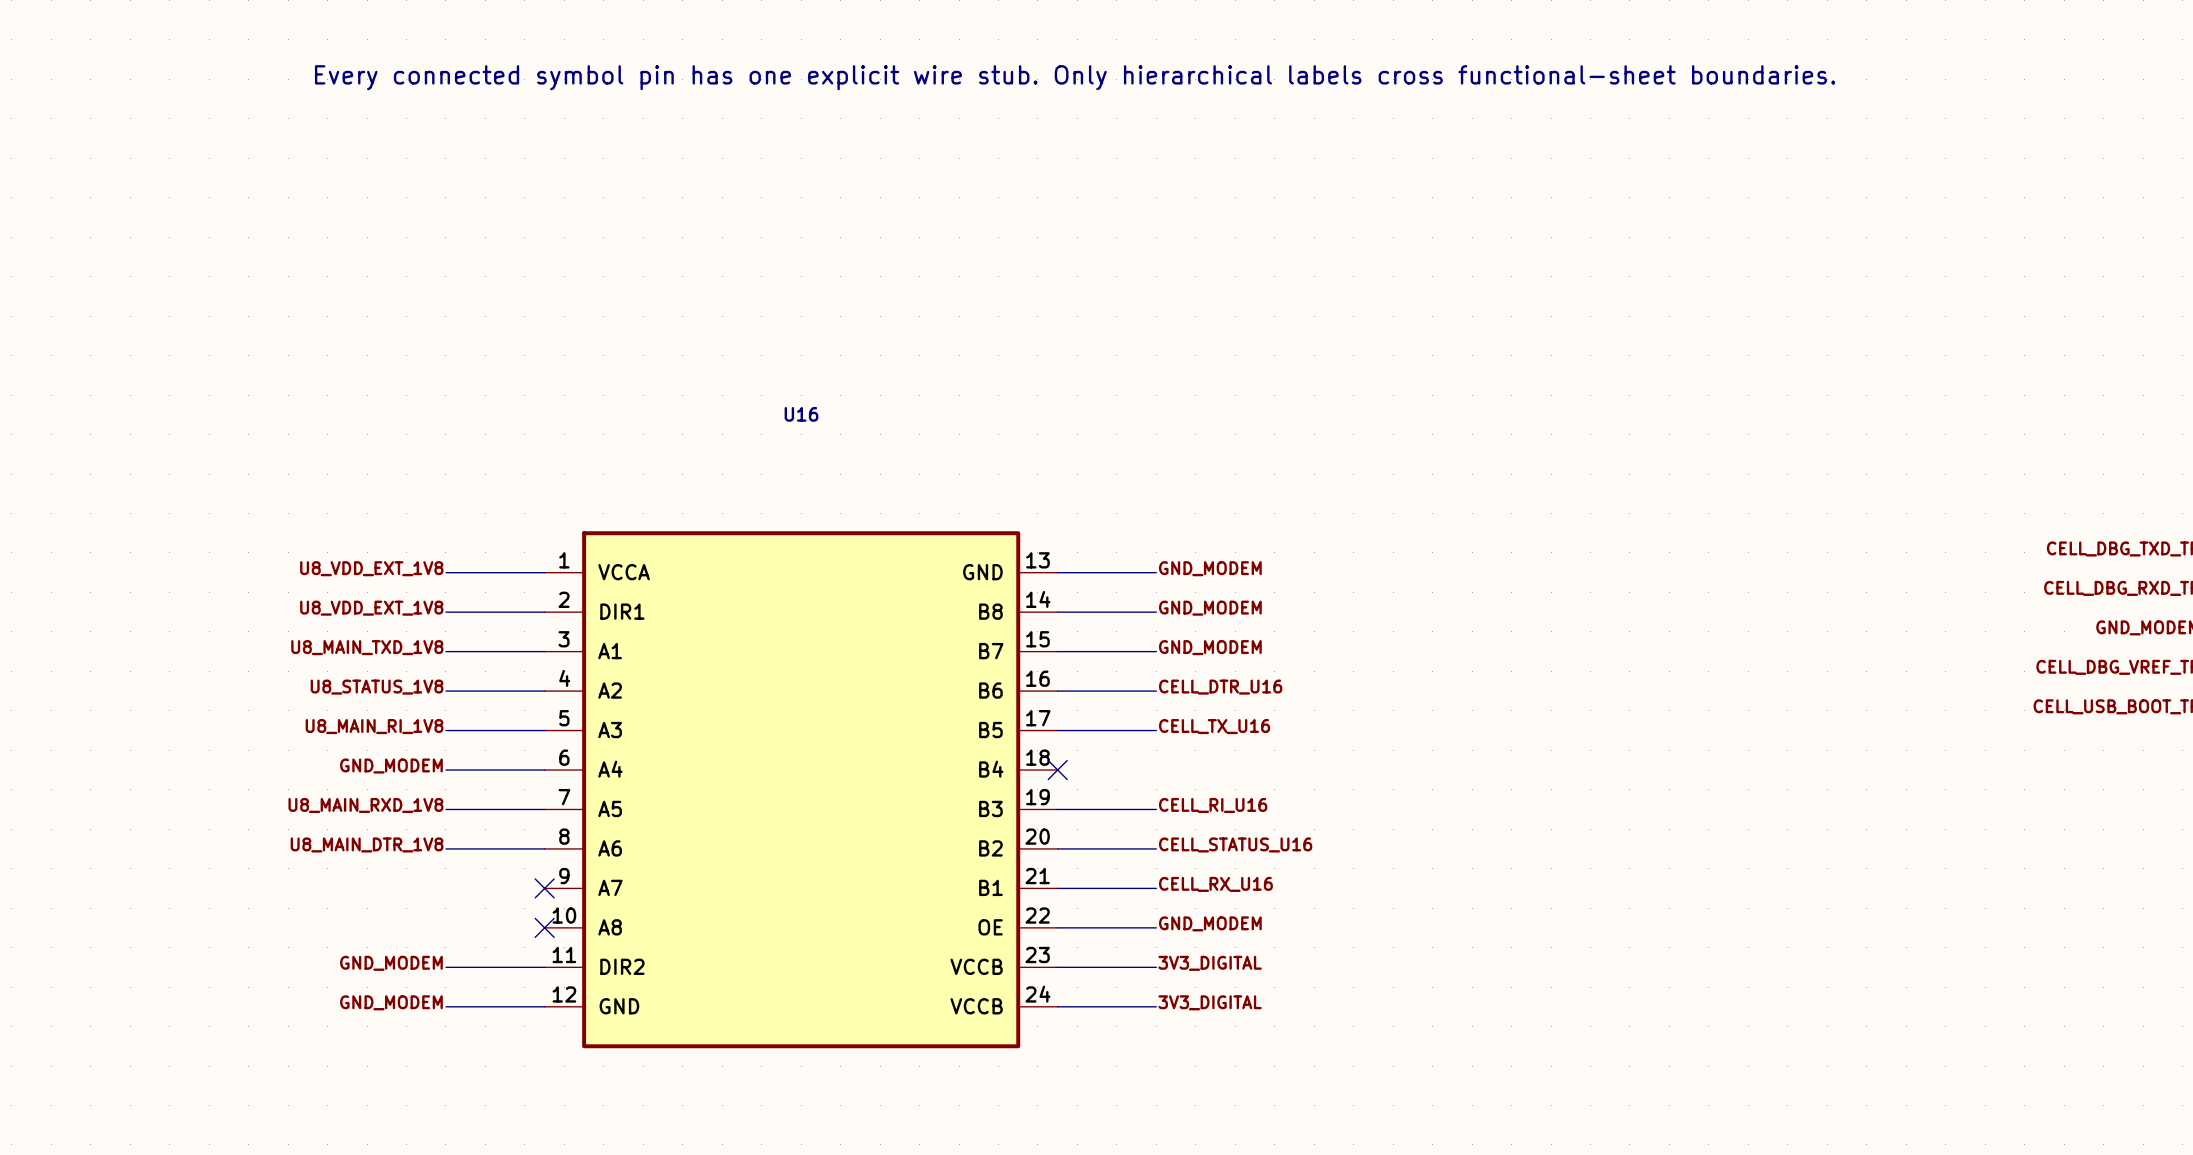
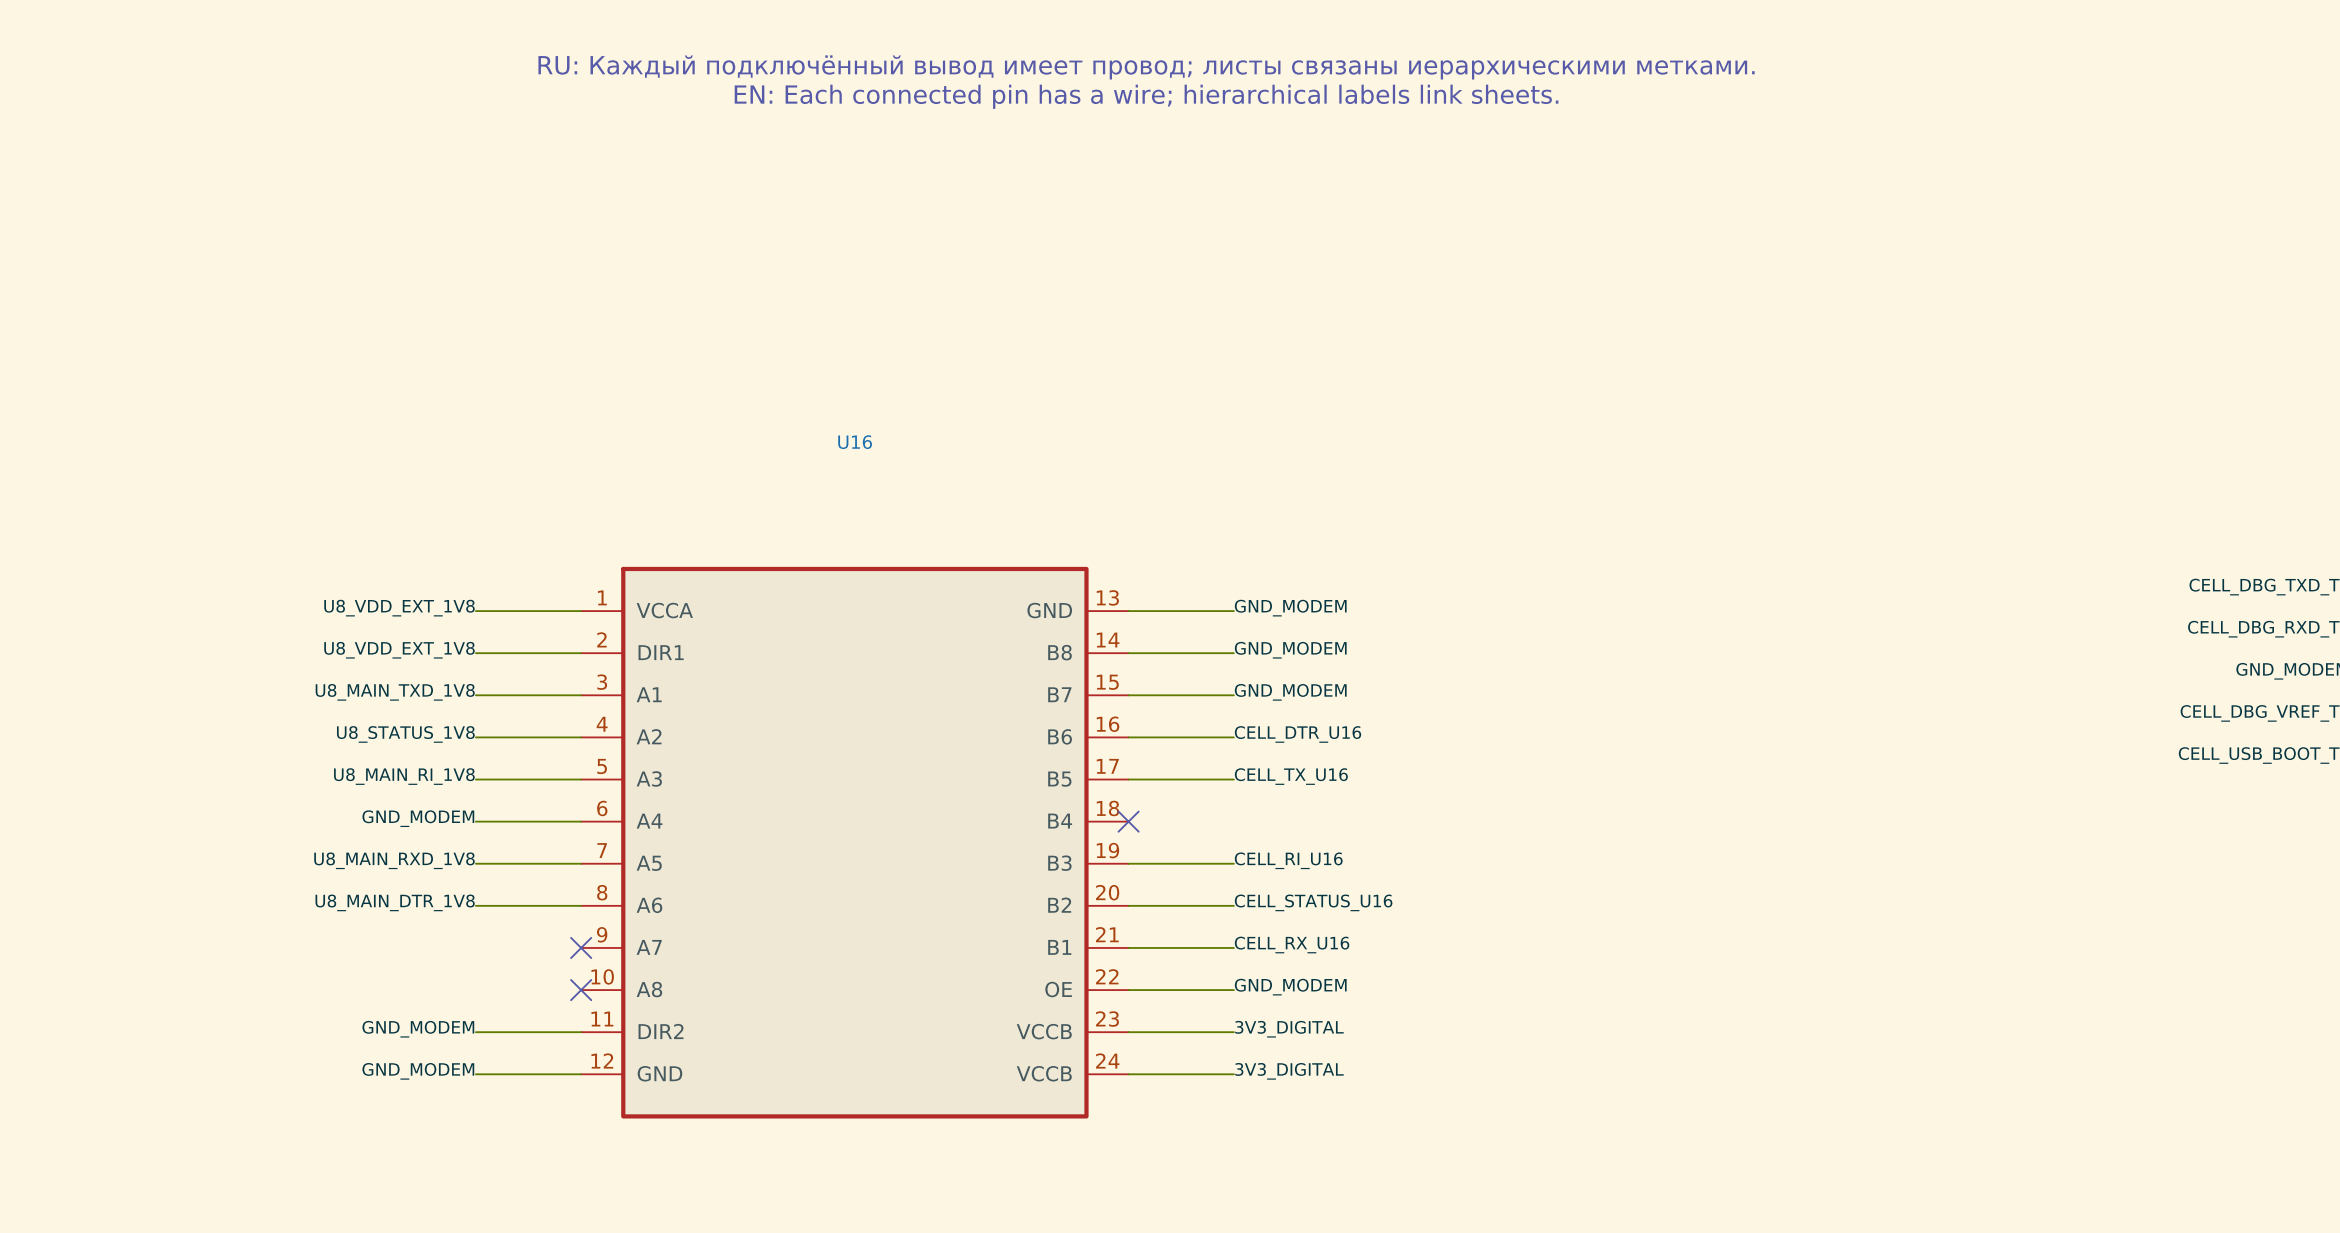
text: none -> RU: Каждый подключённый вывод имеет провод; листы связаны иерархическими метками. (1146, 67)
text: Every connected symbol pin has one explicit wire stub. Only hierarchical labels cross functional-sheet boundaries. (1075, 77) -> none
text: none -> EN: Each connected pin has a wire; hierarchical labels link sheets. (1146, 96)

